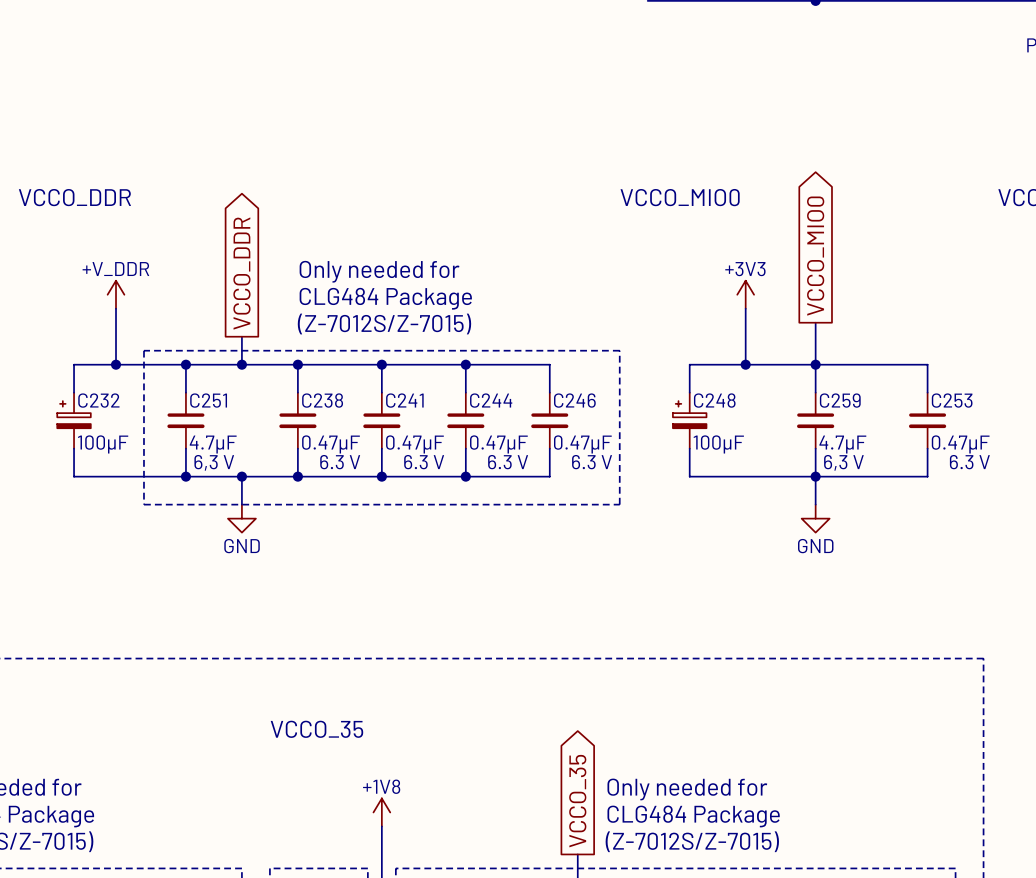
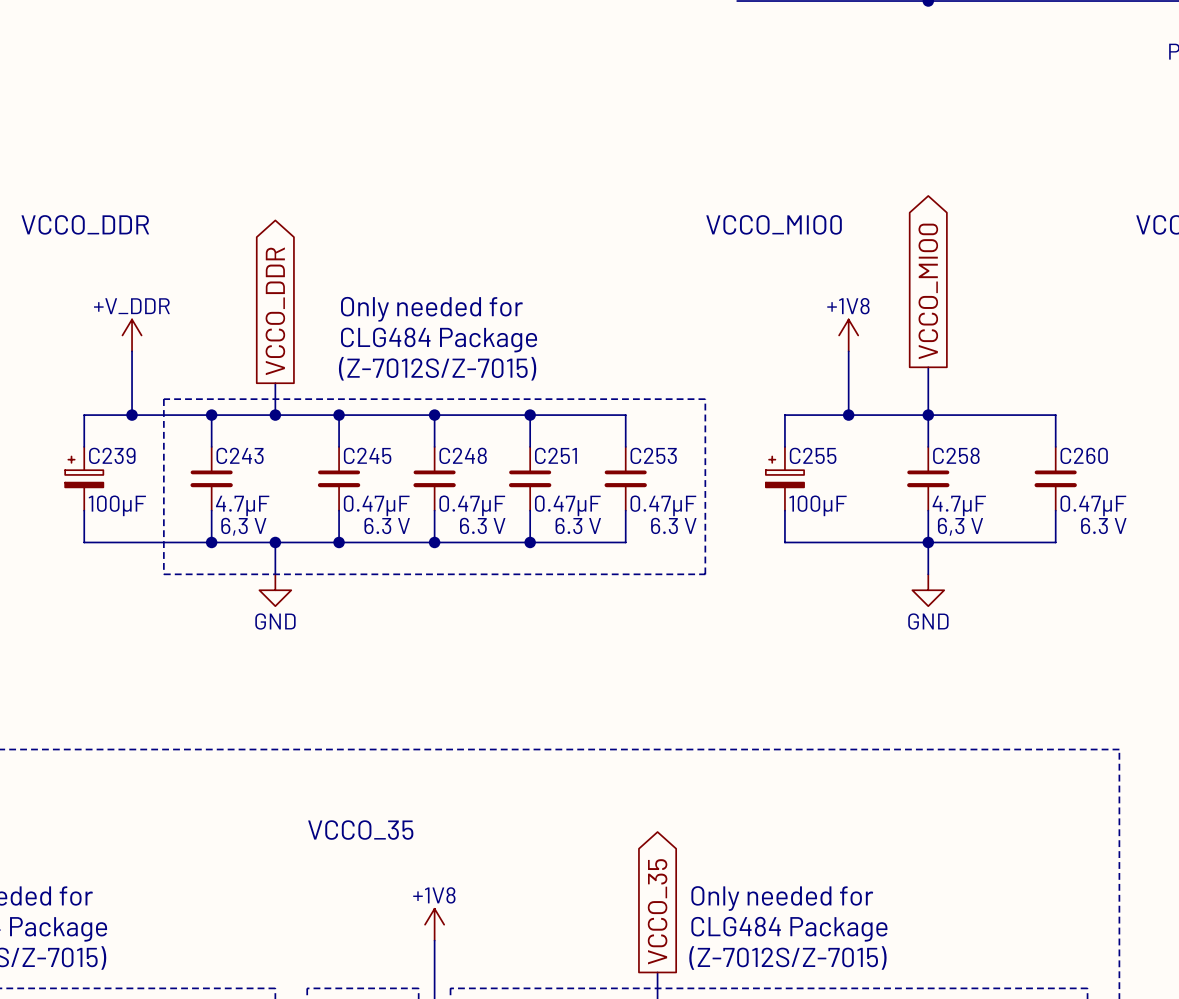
power symbol: +3V3 (745, 294) -> +1V8 (848, 335)
C232 name: C232 (98, 400) -> C239 (112, 455)
C251 name: C251 (208, 400) -> C243 (240, 455)
C238 name: C238 (322, 400) -> C245 (367, 455)
C241 name: C241 (404, 400) -> C248 (463, 455)
C244 name: C244 (491, 400) -> C251 (555, 455)
C246 name: C246 (574, 400) -> C253 (653, 455)
C248 name: C248 (714, 400) -> C255 (813, 455)
C259 name: C259 (840, 400) -> C258 (956, 455)
C253 name: C253 (952, 400) -> C260 (1084, 455)

